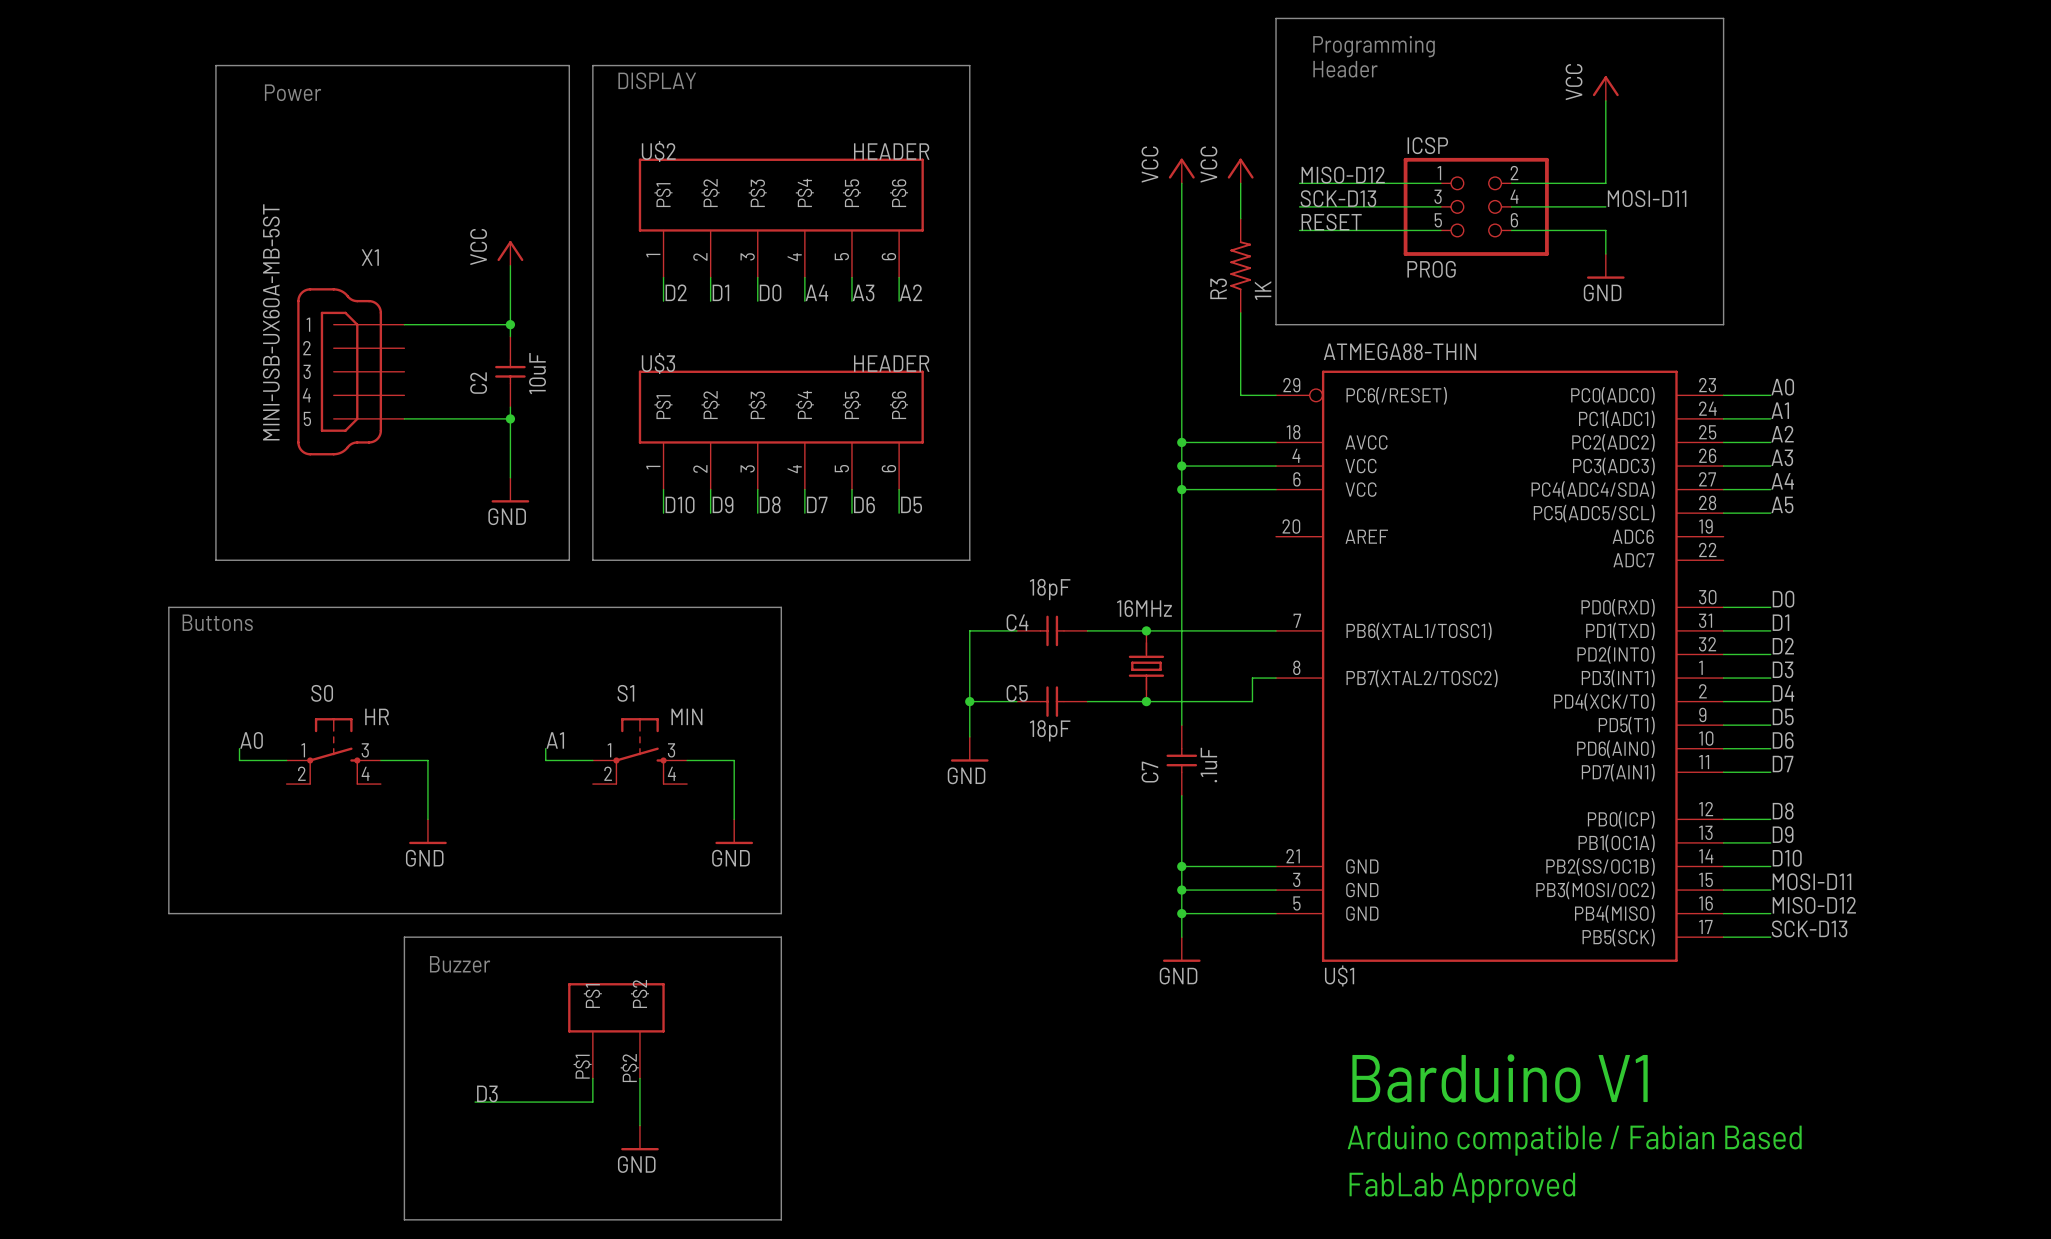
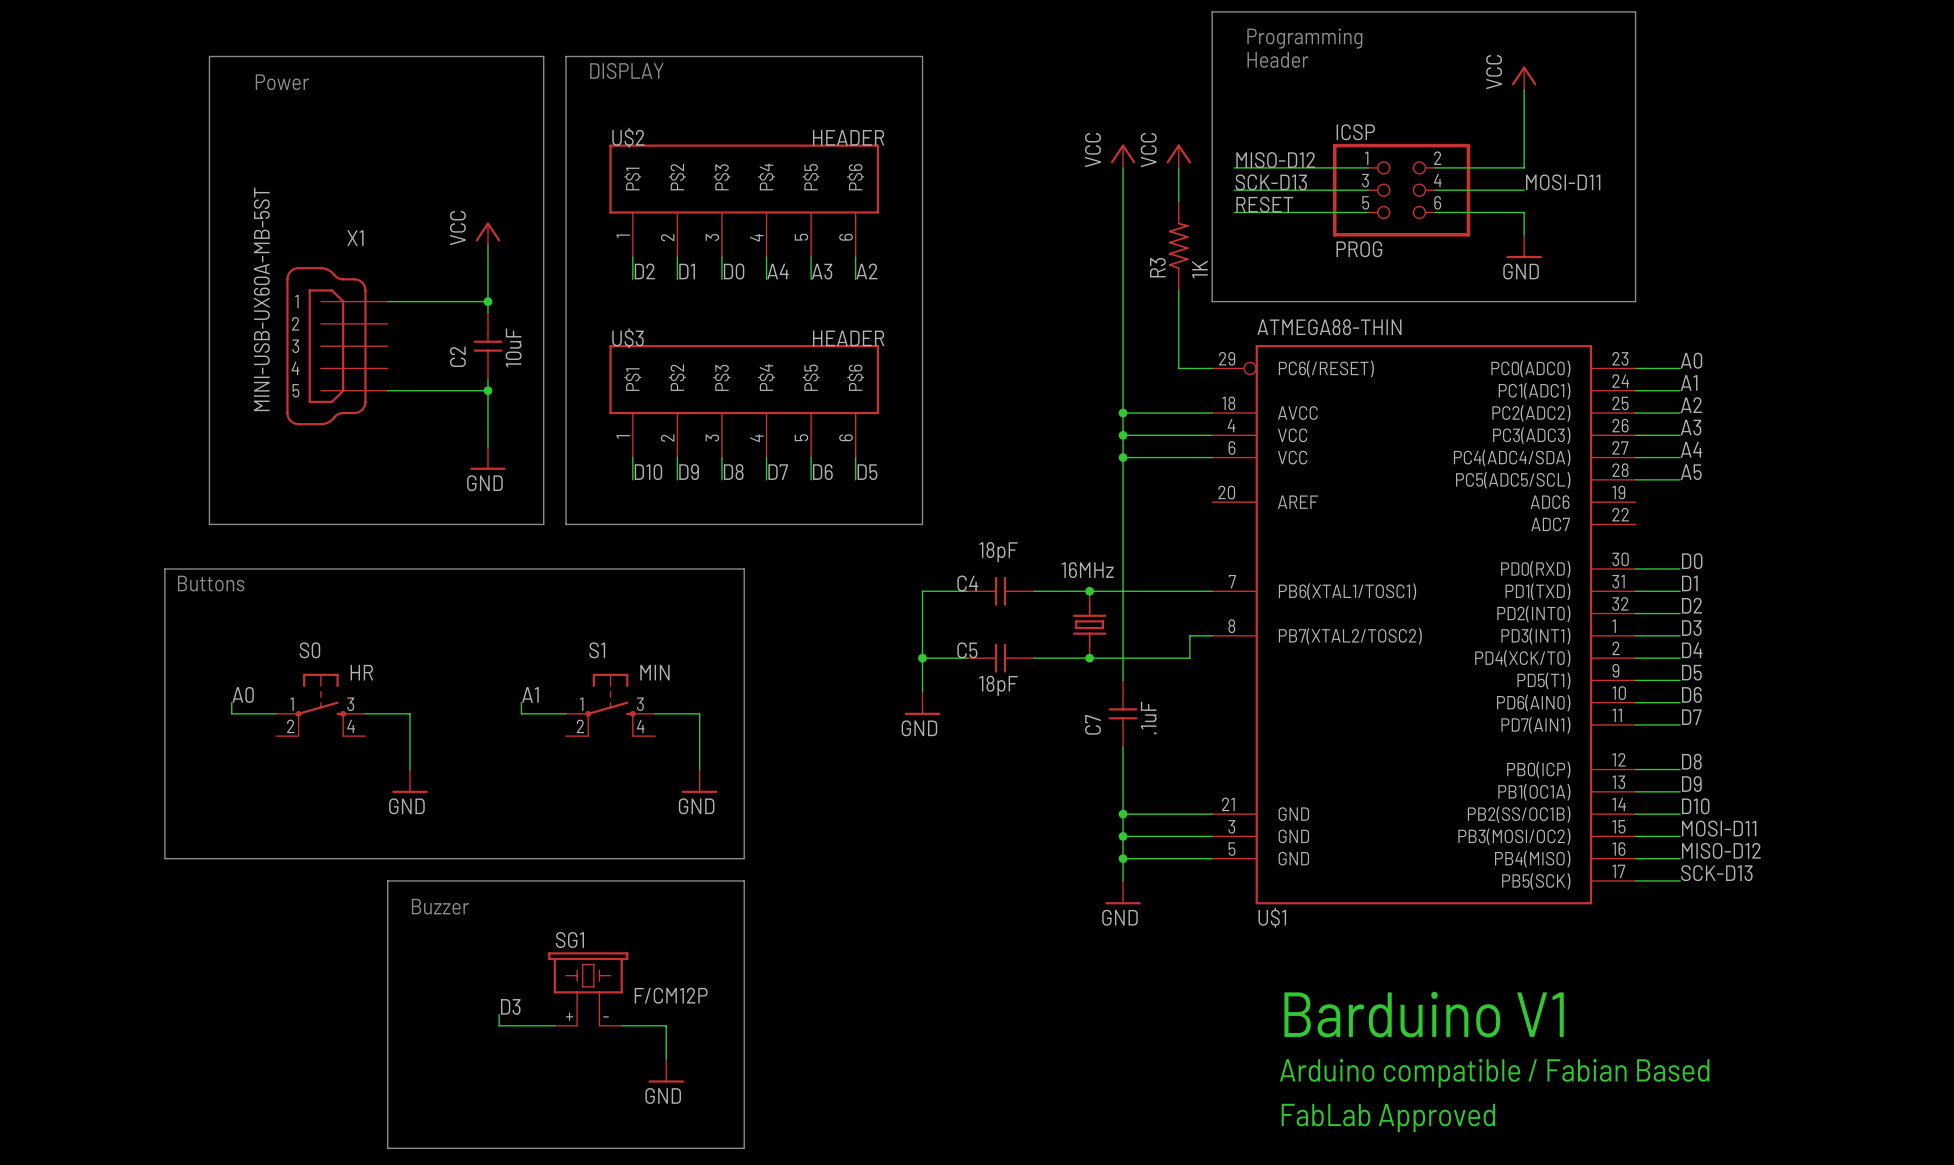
part: (616, 1030) -> none
SG1: none -> F/CM12P (588, 989)
wire: none -> (499, 1014) (499, 1025) (554, 1025)
wire: (592, 1078) (592, 1102) (475, 1102) -> none
wire: (639, 1078) (639, 1125) -> none
wire: none -> (621, 1025) (666, 1025) (666, 1059)
label position: D3 (487, 1093) -> D3 (510, 1006)
power symbol position: GND (639, 1137) -> GND (666, 1070)

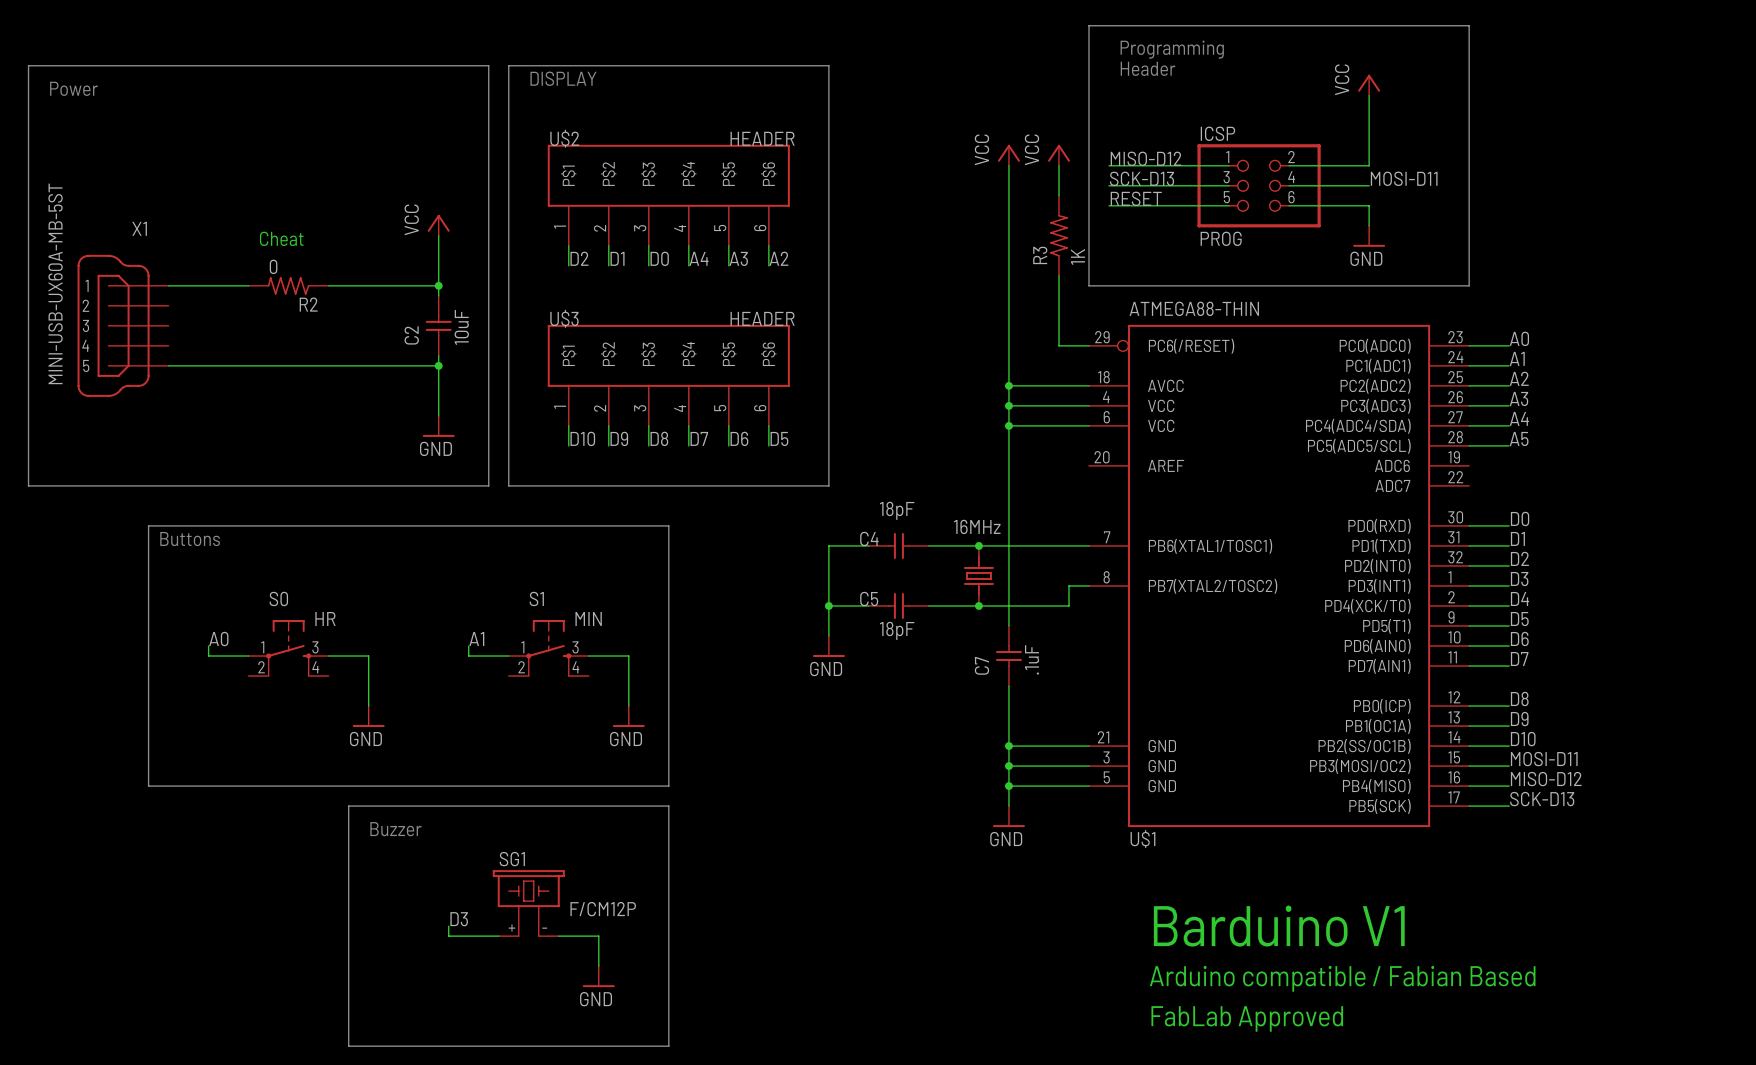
line: (209, 56) (209, 524) -> (188, 65) (28, 65) (28, 485) (188, 485)
text position: Power (282, 82) -> Power (73, 88)
text: none -> Cheat (281, 238)
wire: none -> (168, 285) (248, 285)
R2: none -> 0 (288, 285)
X1 position: (337, 346) -> (123, 325)
wire: none -> (168, 365) (348, 365)

